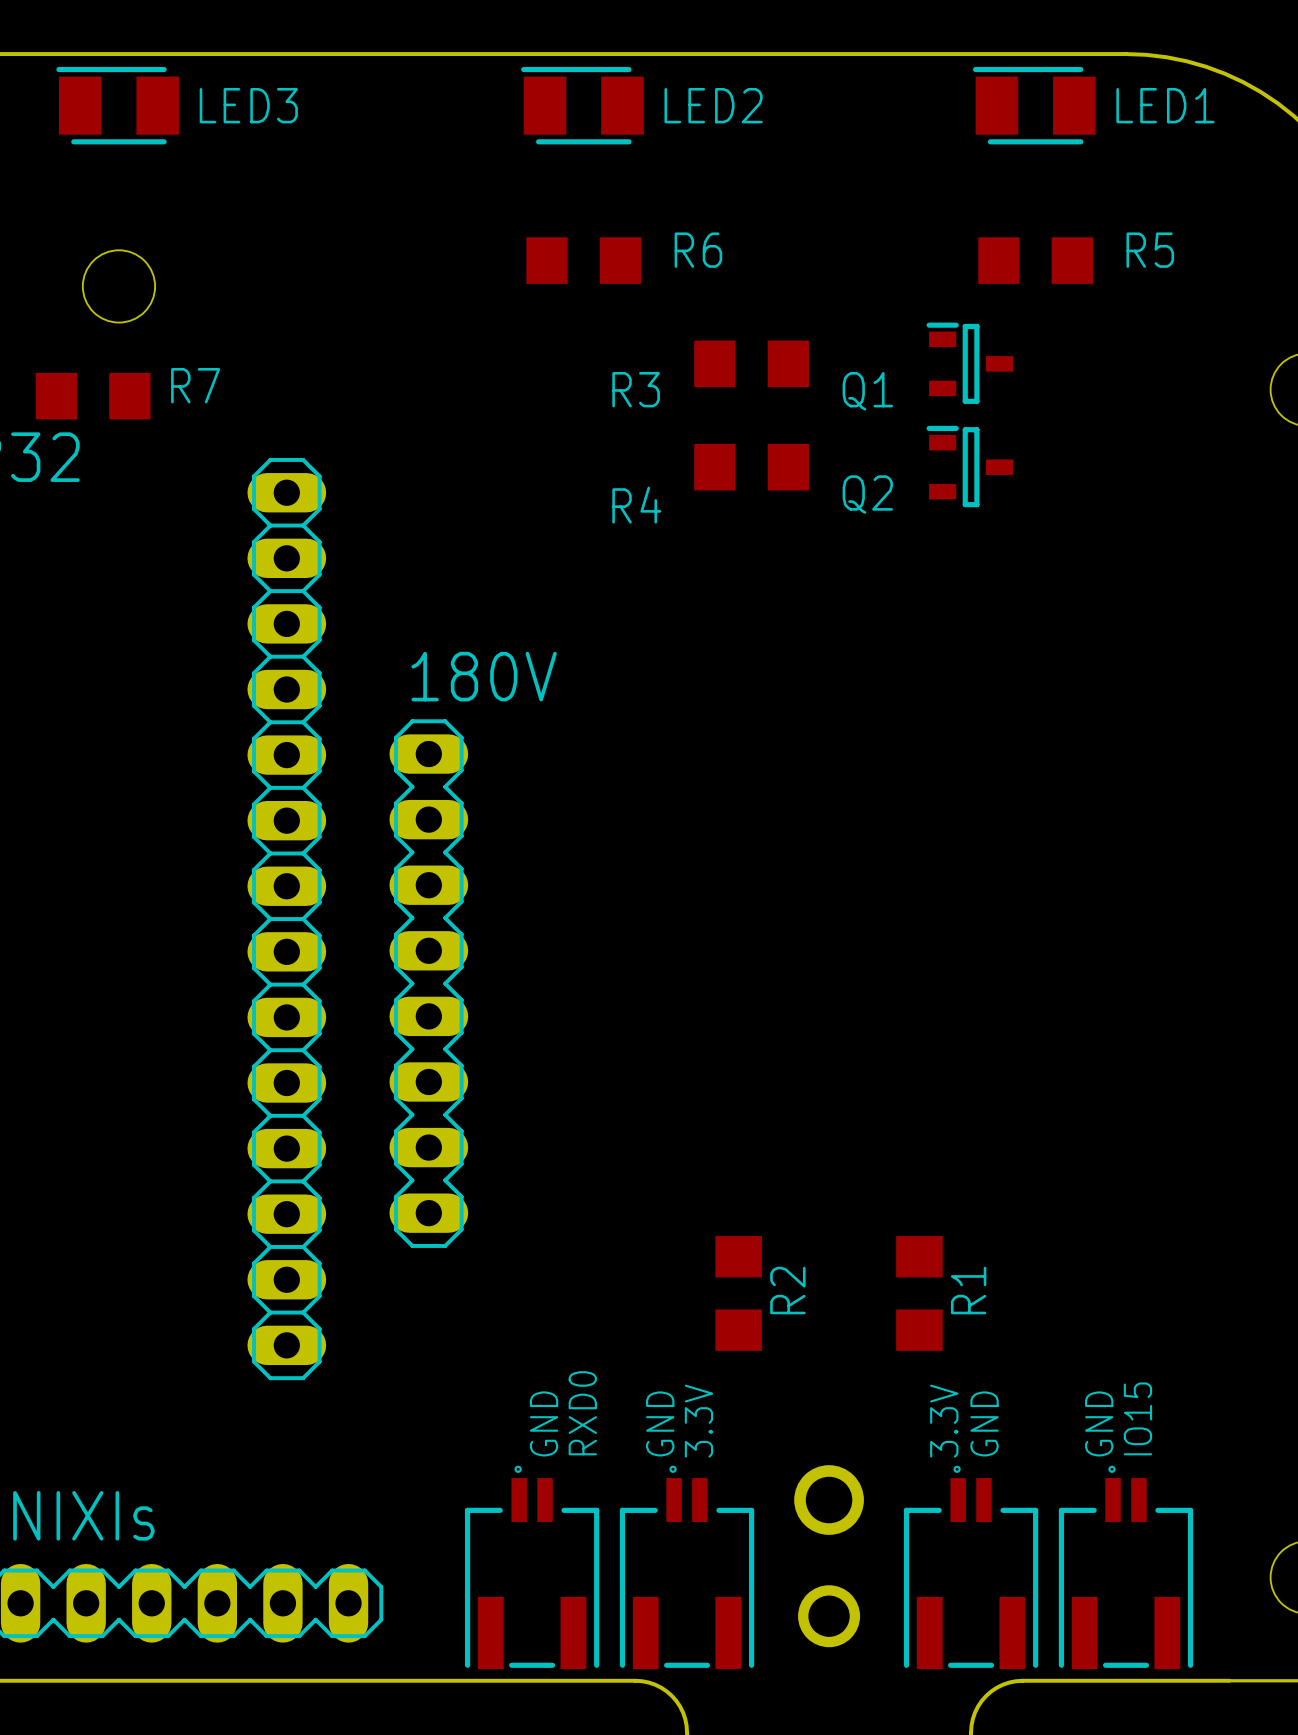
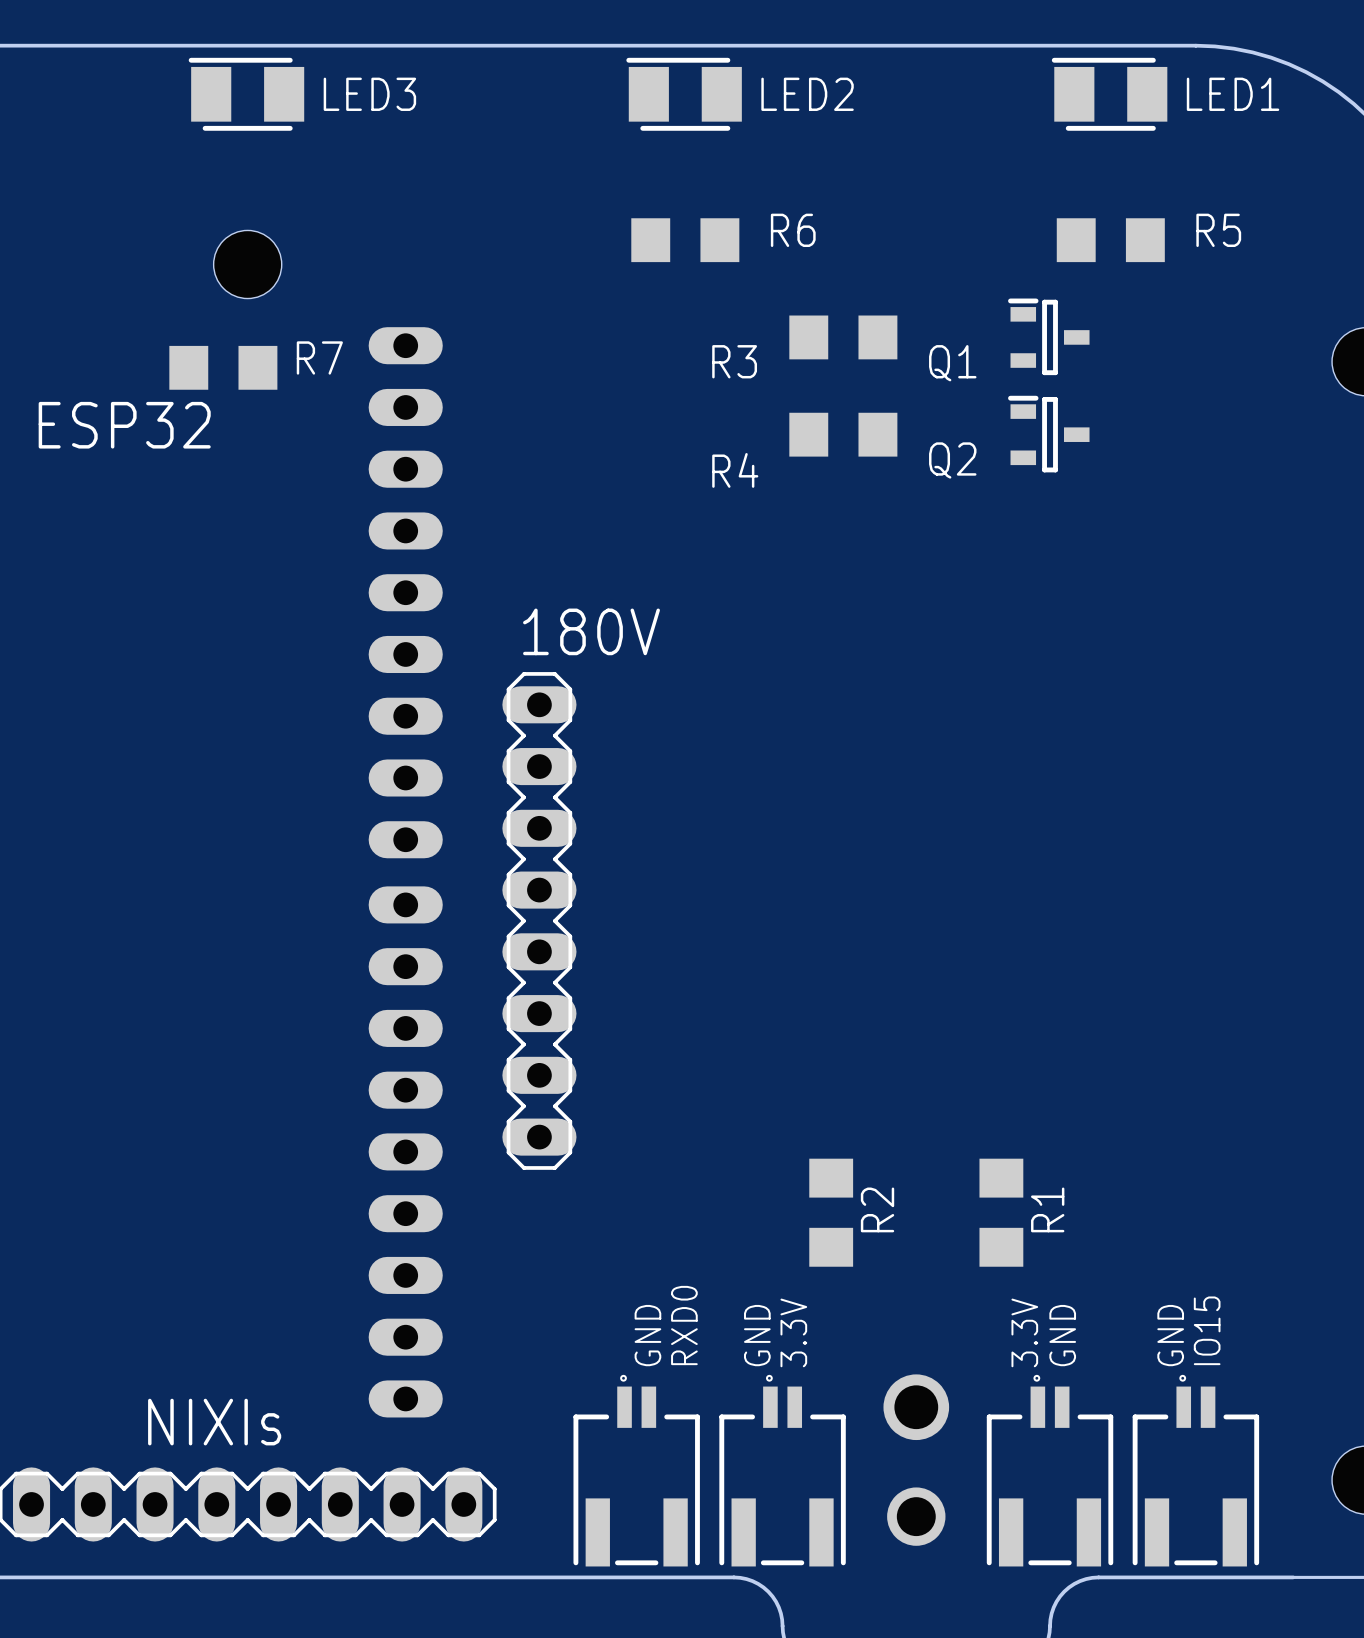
part: none -> (405, 592)
part: (286, 919) -> none
part: none -> (405, 1151)

